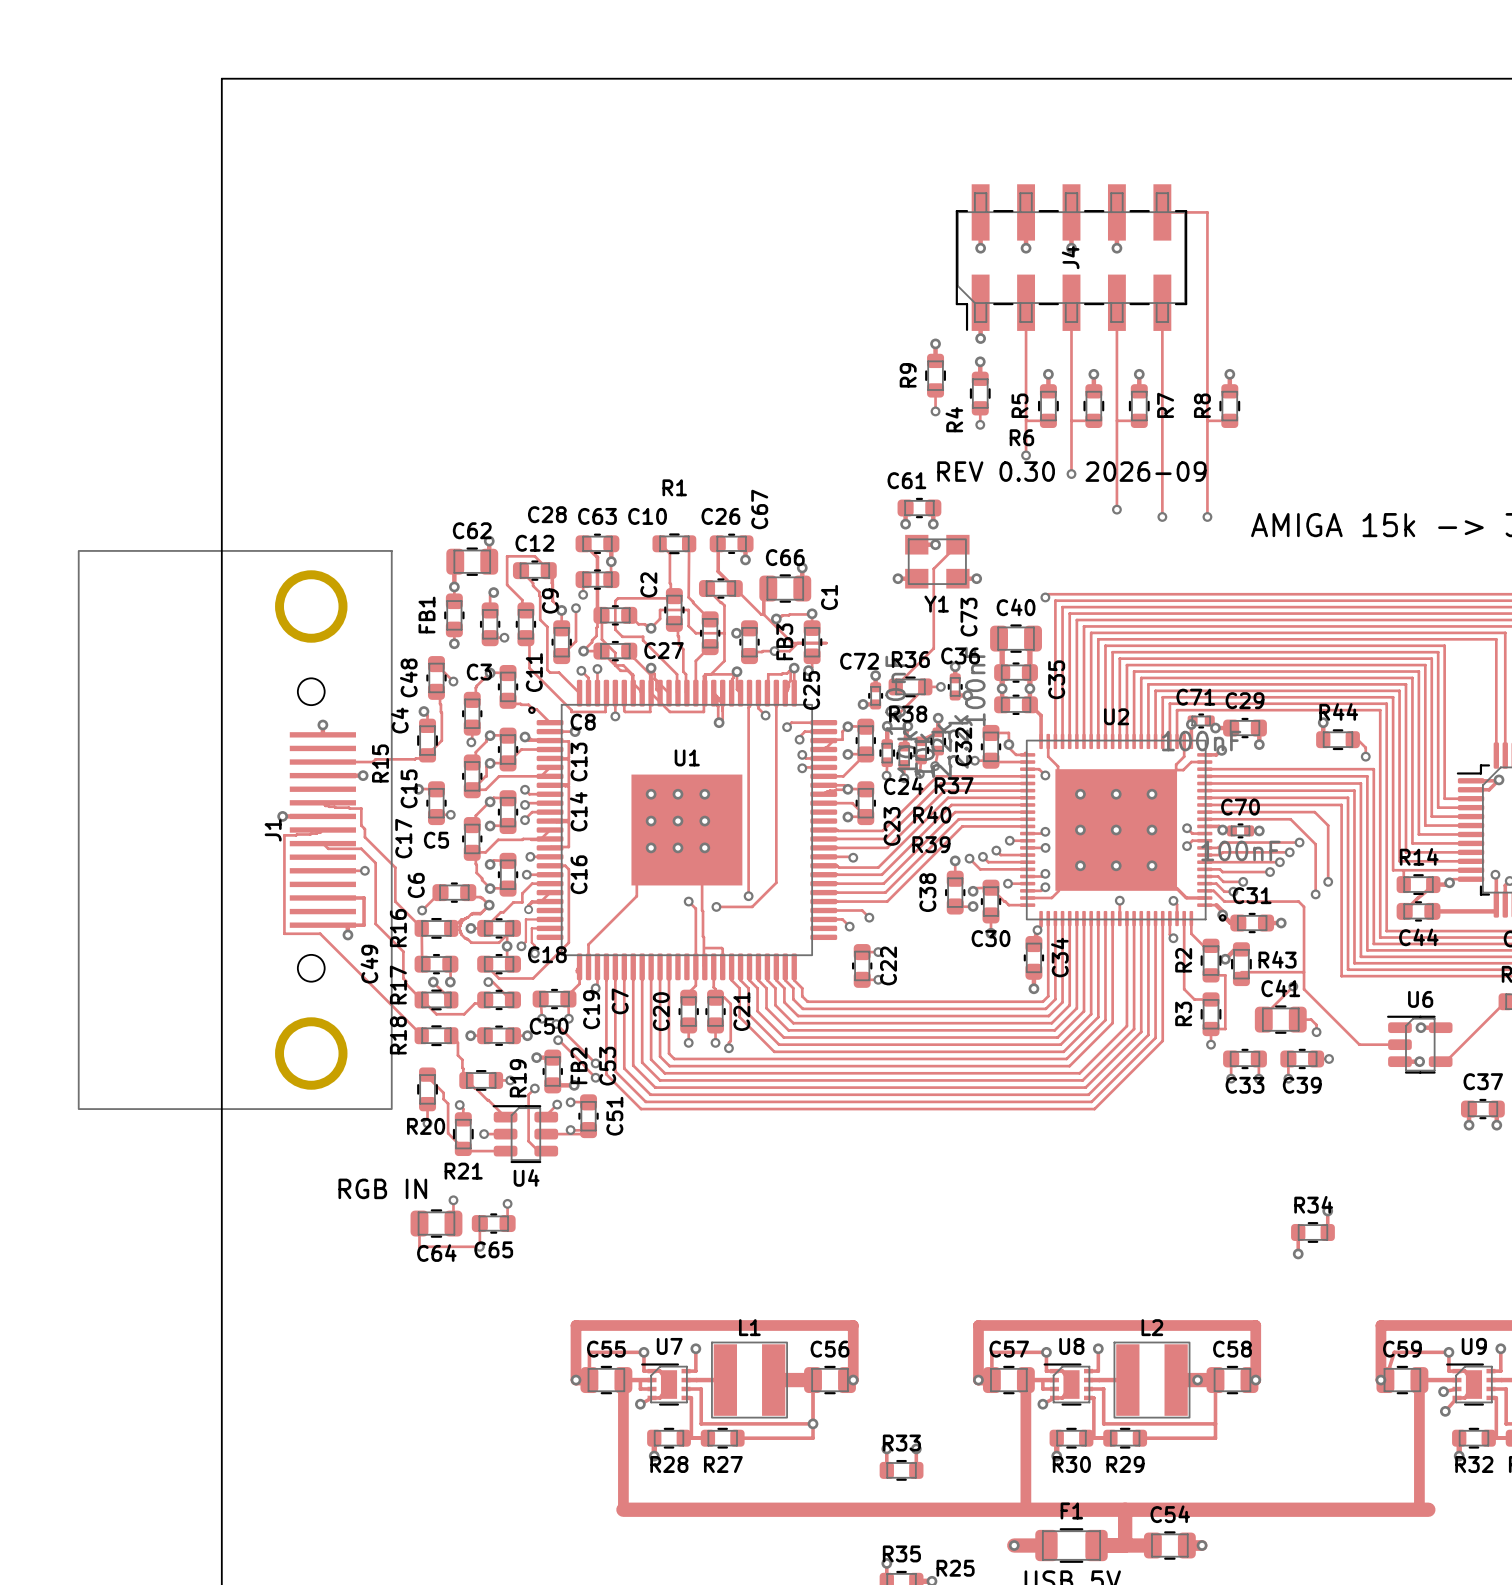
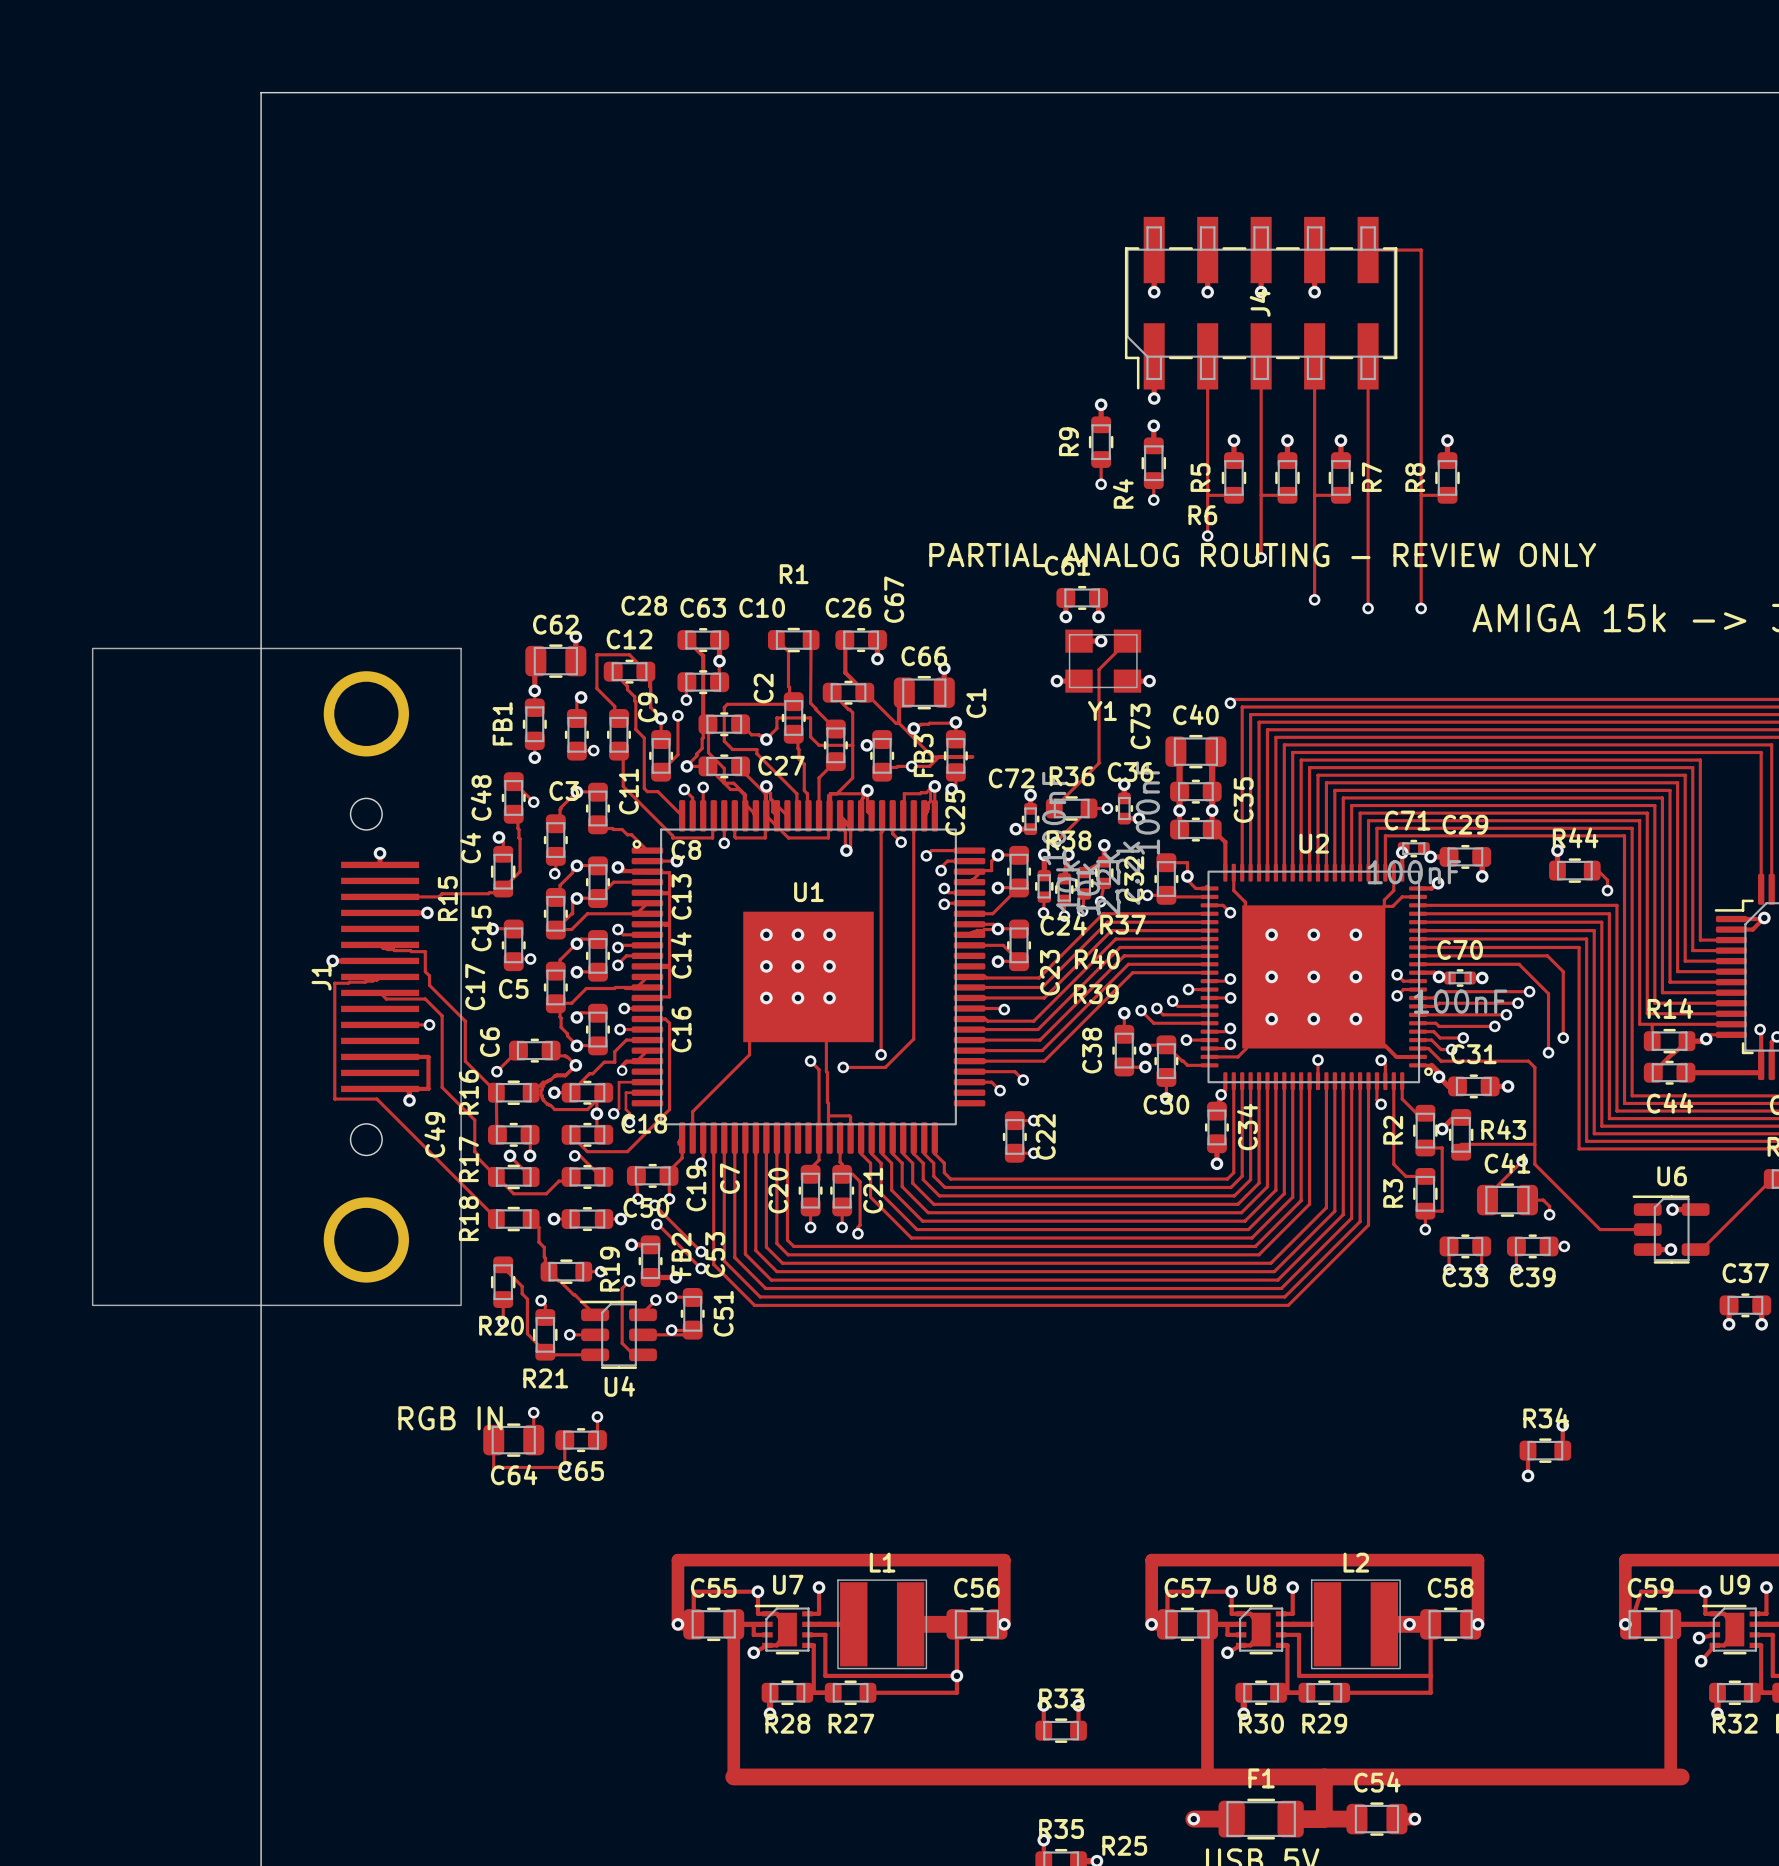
text: REV 0.30 2026-09 (1071, 471) -> PARTIAL ANALOG ROUTING - REVIEW ONLY (1262, 555)
U1 footprint: [528, 679, 838, 981] -> [631, 800, 986, 1154]
U2 footprint: [1020, 733, 1227, 927] -> [1200, 863, 1433, 1091]
text position: RGB IN (382, 1188) -> RGB IN (450, 1418)

